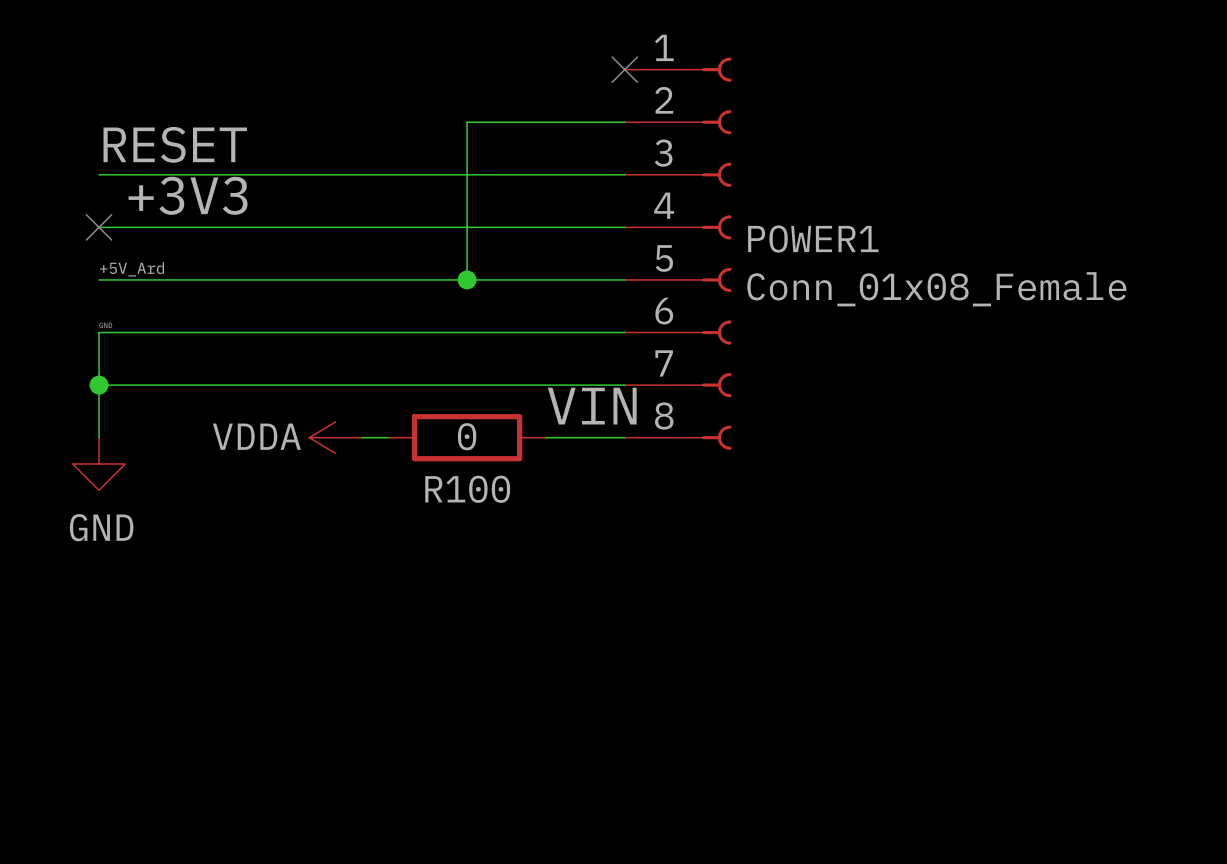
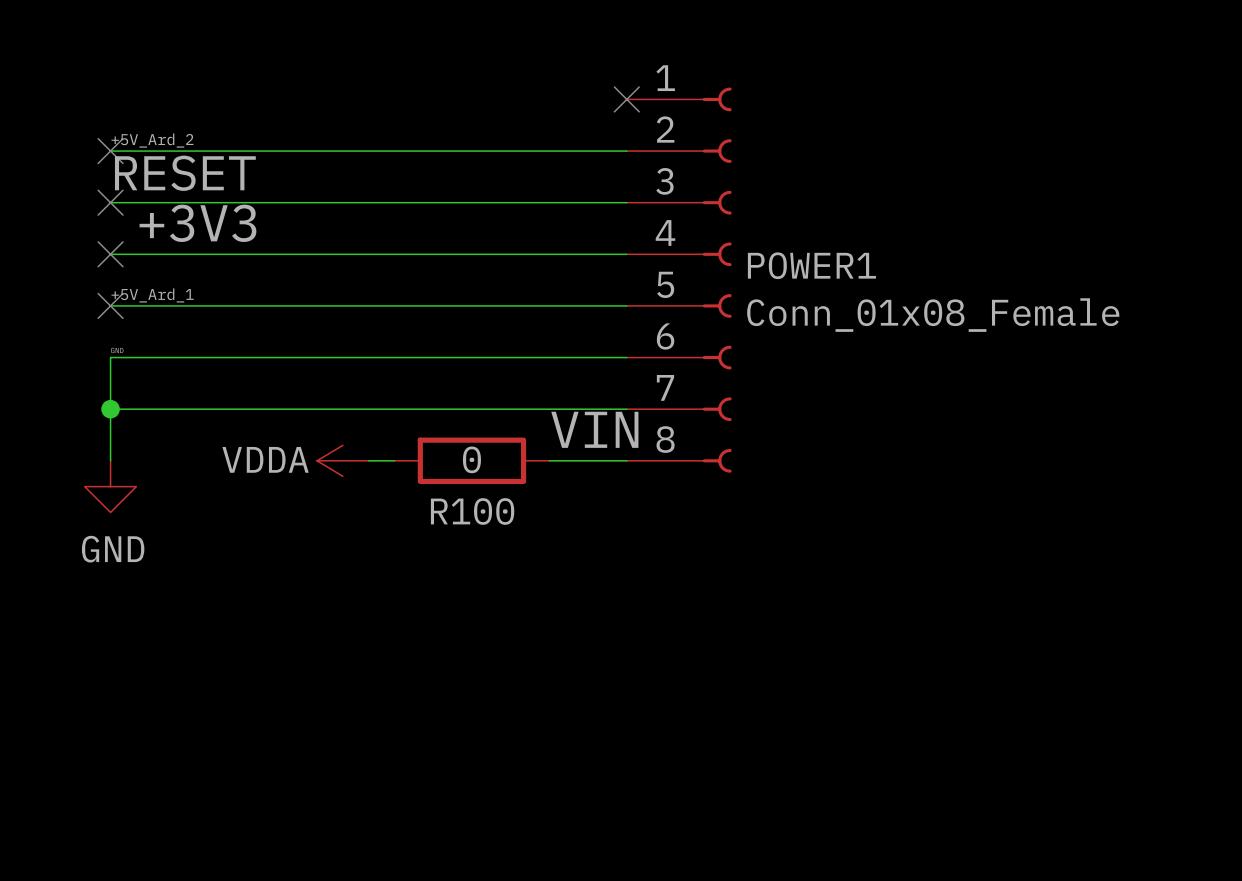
label: none -> +5V_Ard_2 (152, 140)
no-connect mark: none -> (110, 151)
wire: (467, 122) (467, 279) -> (471, 151) (110, 151)
no-connect mark: none -> (110, 202)
label: +5V_Ard (131, 269) -> +5V_Ard_1 (152, 295)
no-connect mark: none -> (110, 305)
junction: (467, 279) -> none

